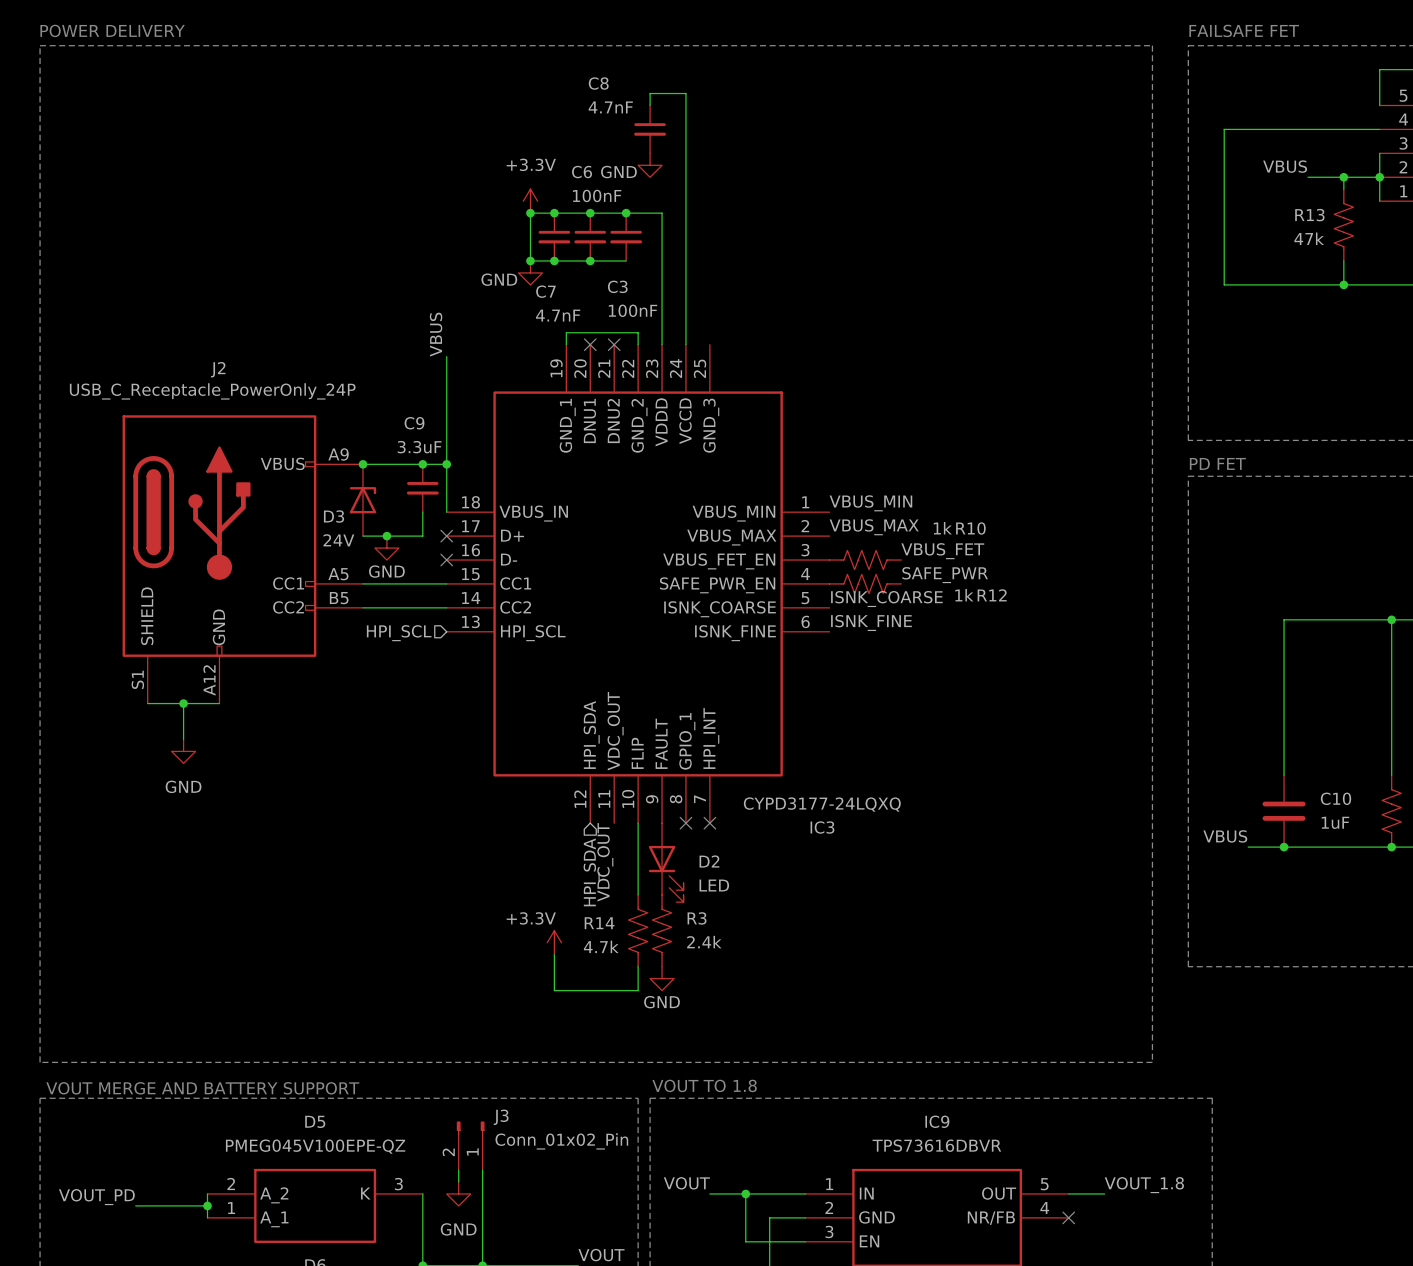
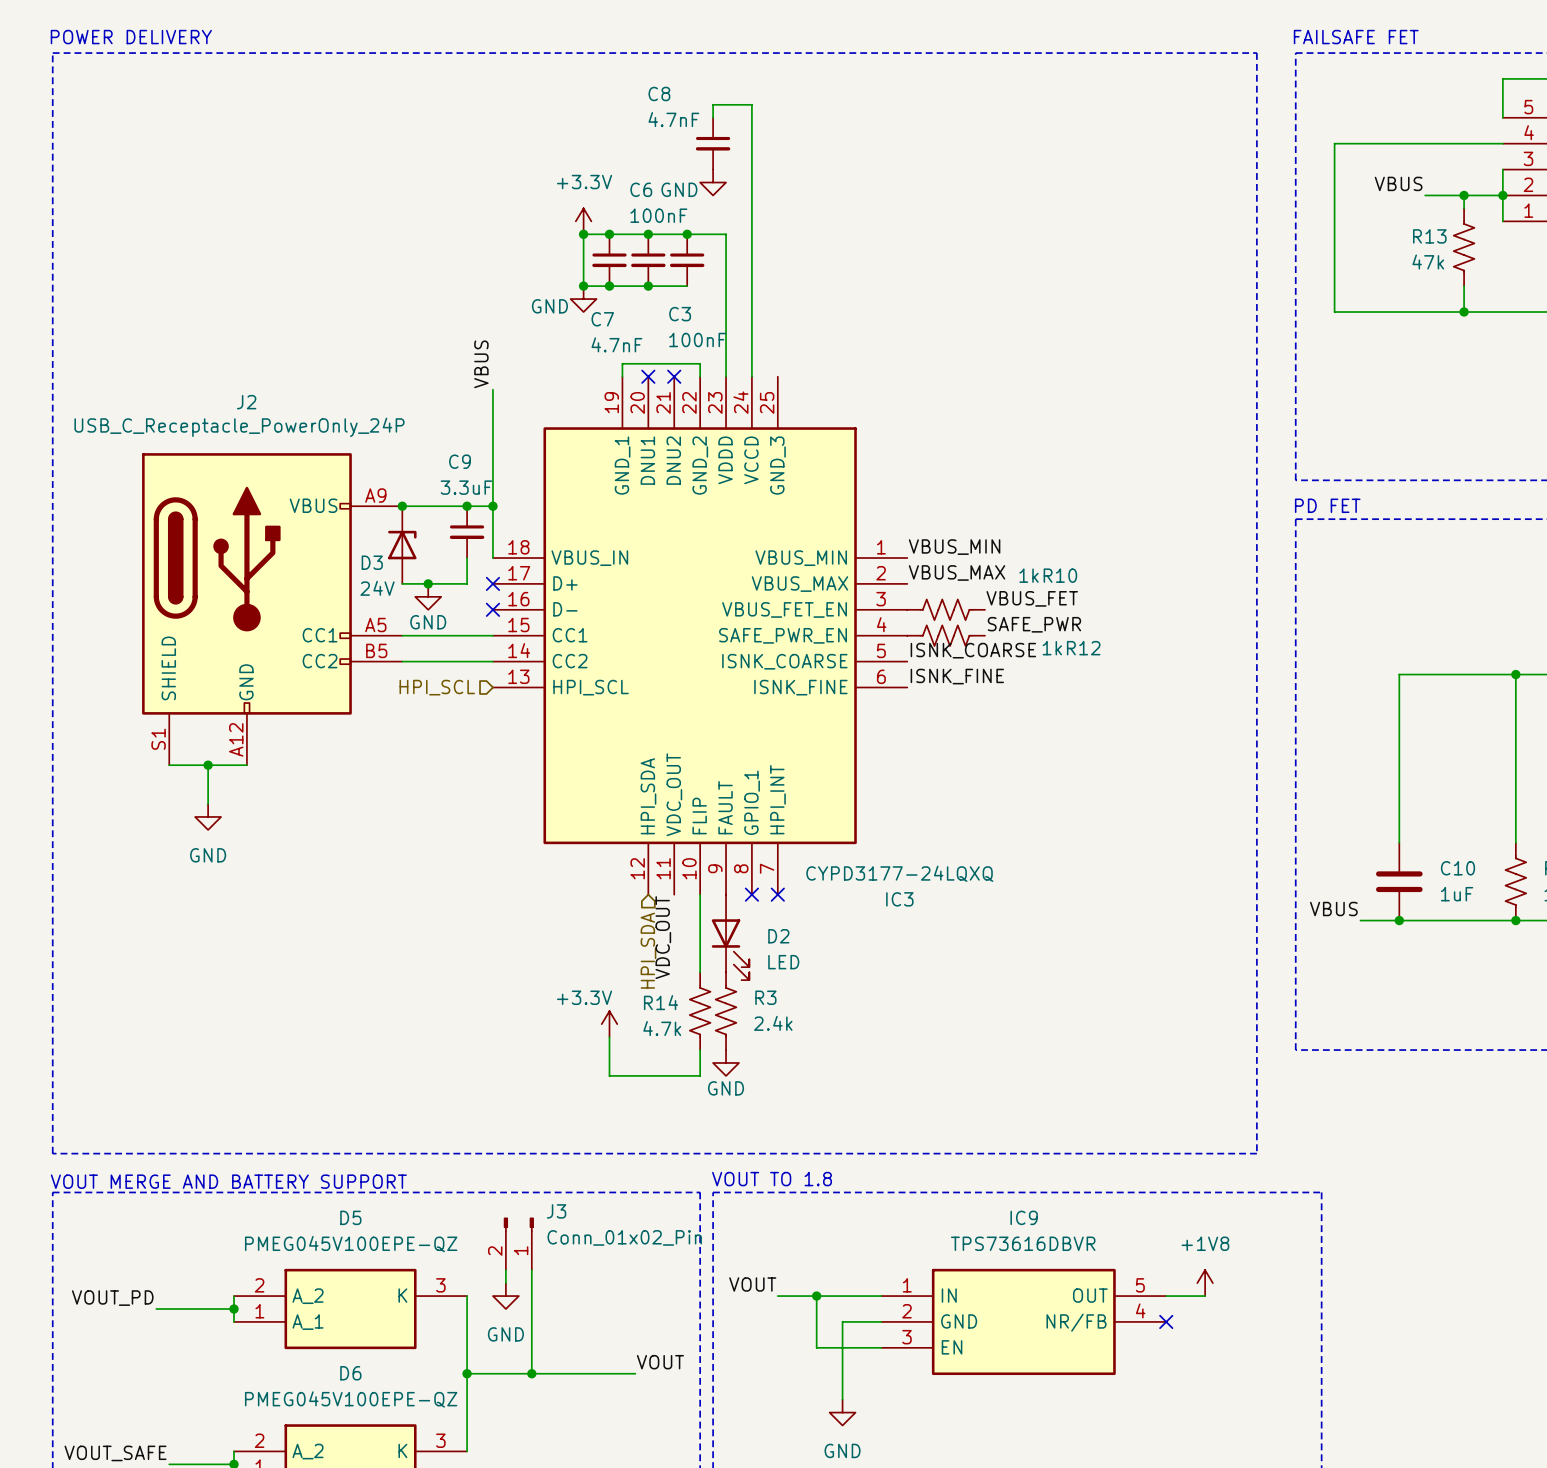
power symbol: none -> +1V8 (1205, 1283)
label: VOUT_1.8 (1144, 1185) -> none

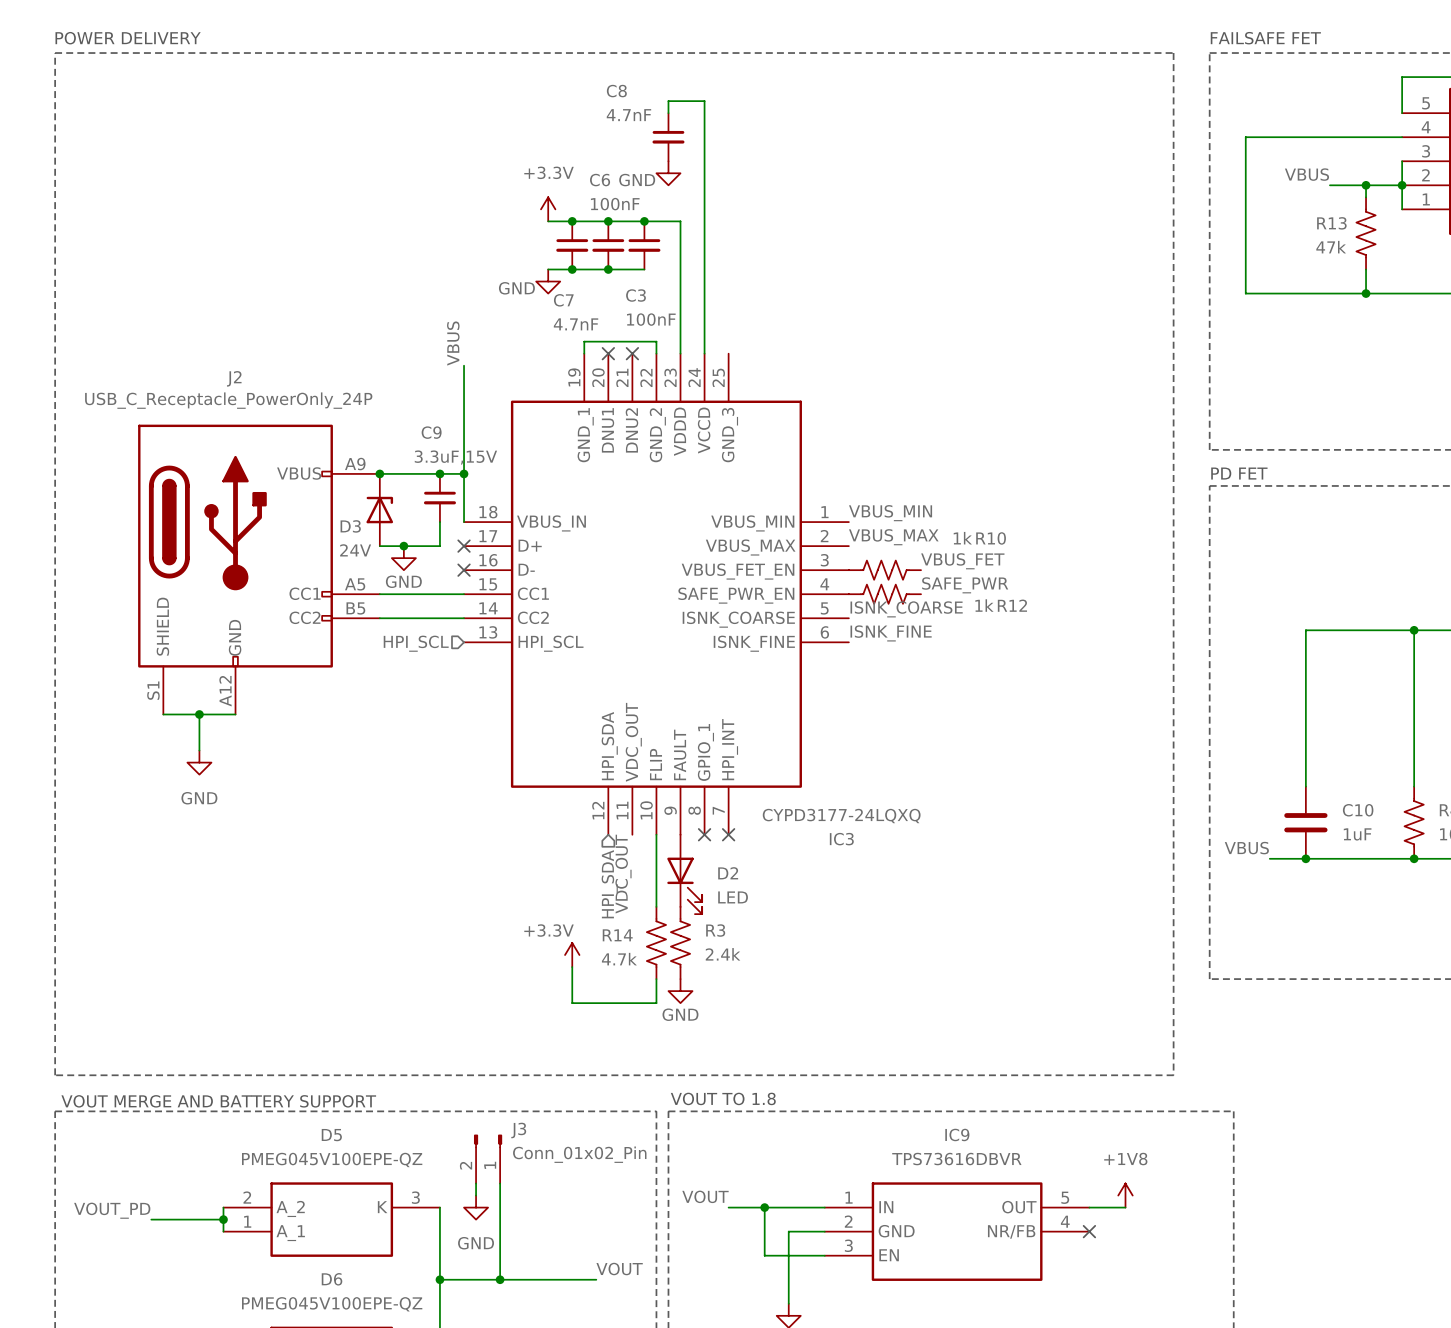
wire: (583, 234) (583, 286) -> none
junction: (583, 234) -> none
junction: (583, 286) -> none
C9 value: 3.3uF (466, 487) -> 3.3uF,15V (455, 457)

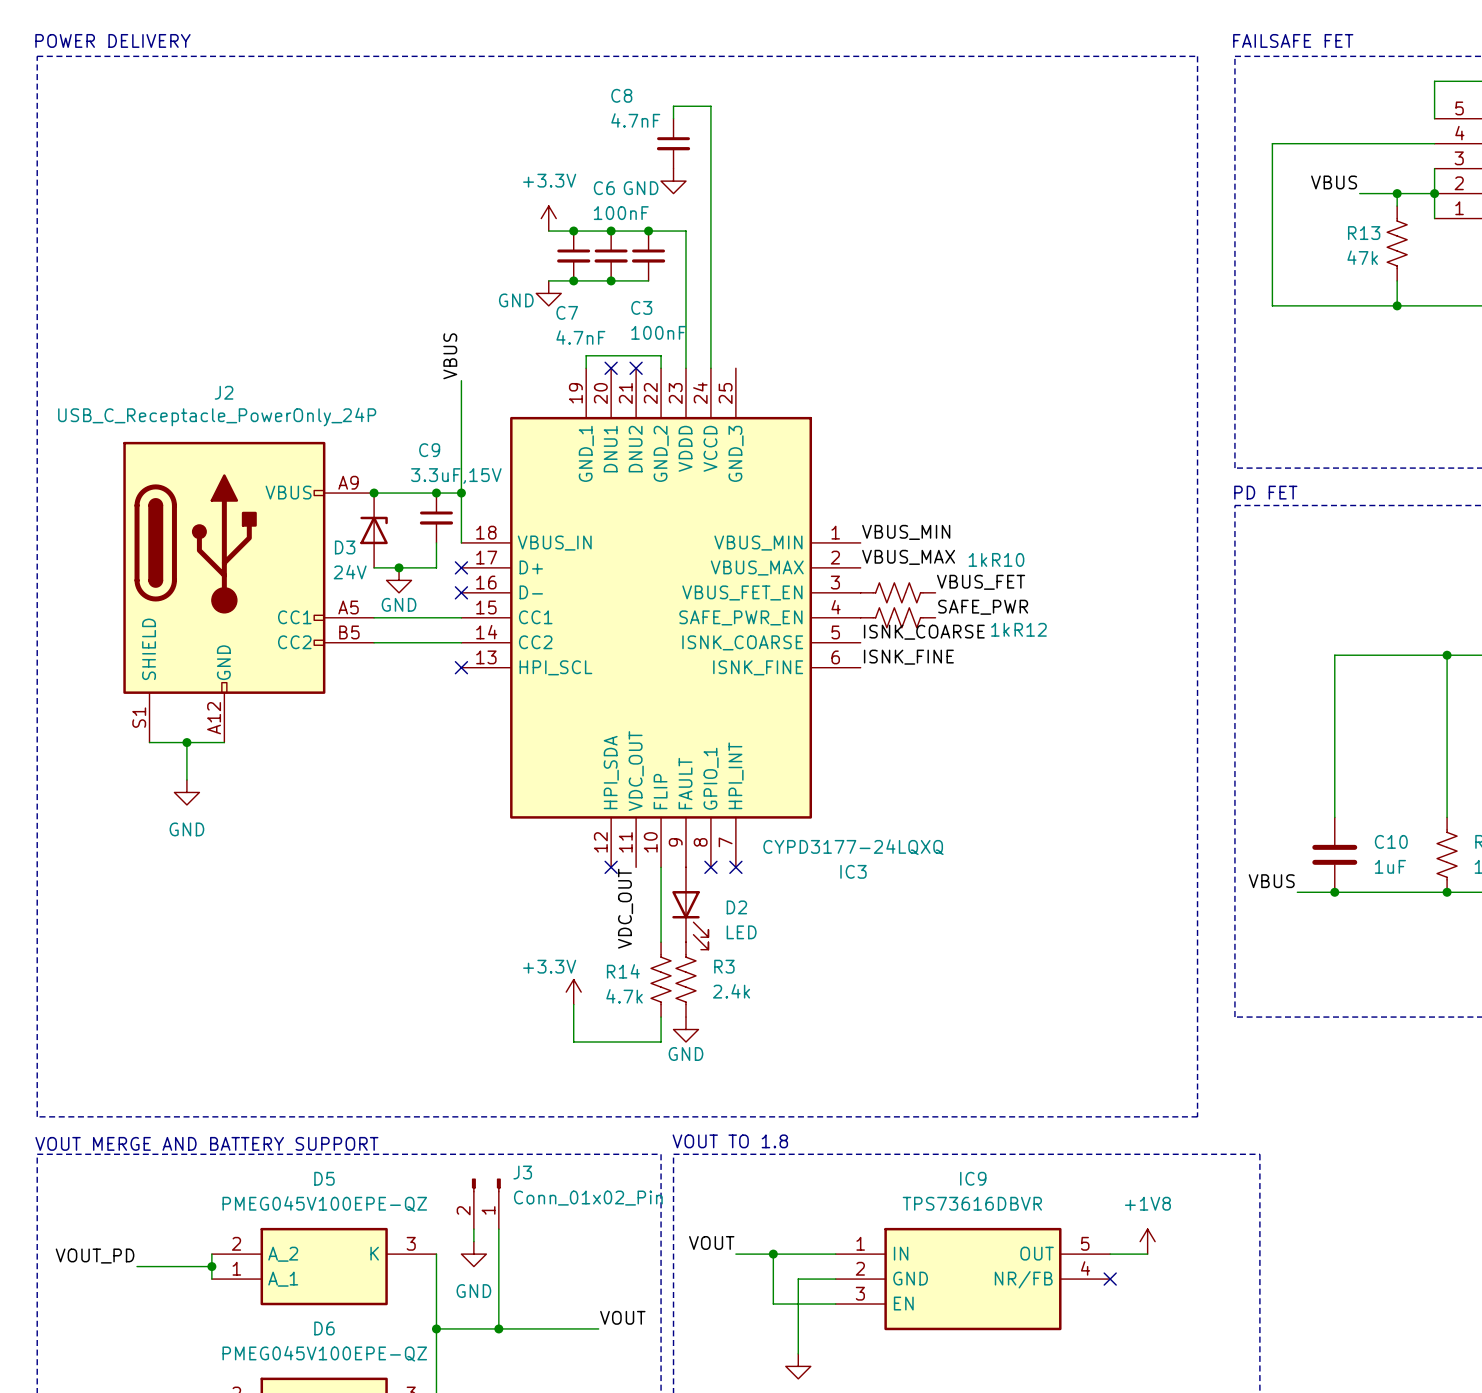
no-connect mark: none -> (461, 667)
hierarchical label: HPI_SCL (416, 643) -> none
no-connect mark: none -> (611, 867)
hierarchical label: HPI_SDA (609, 884) -> none

